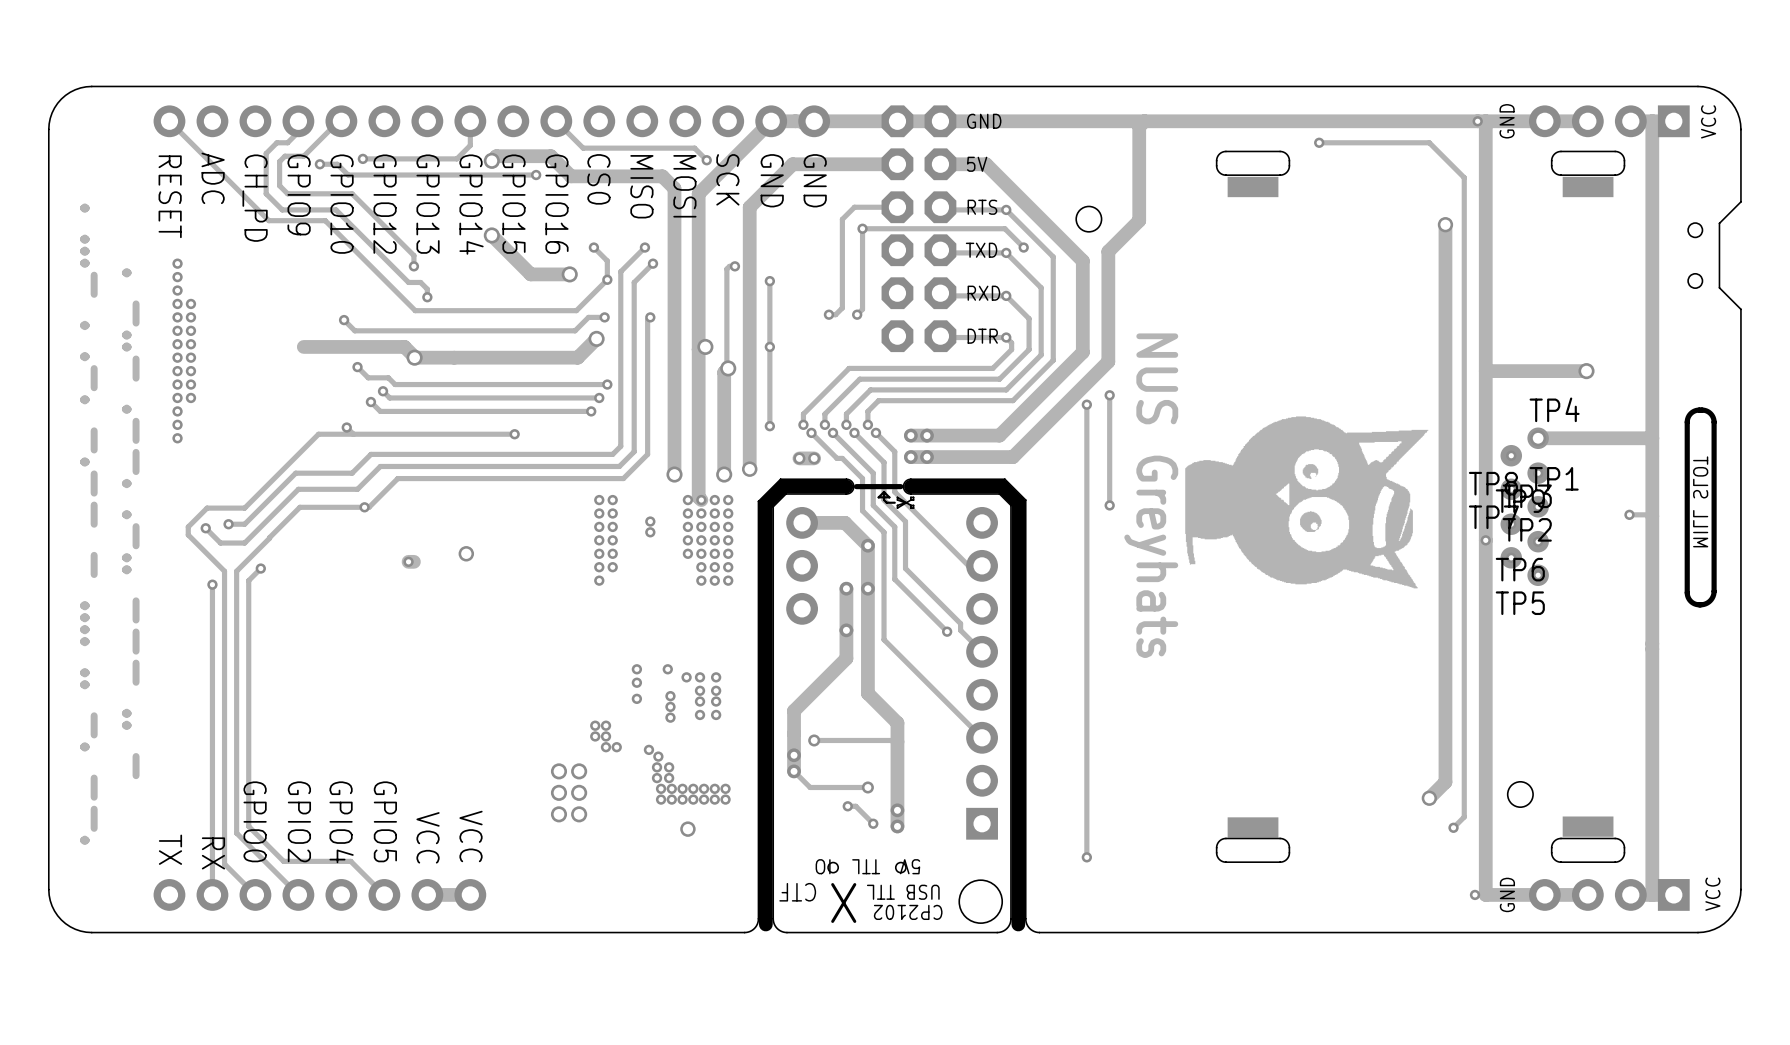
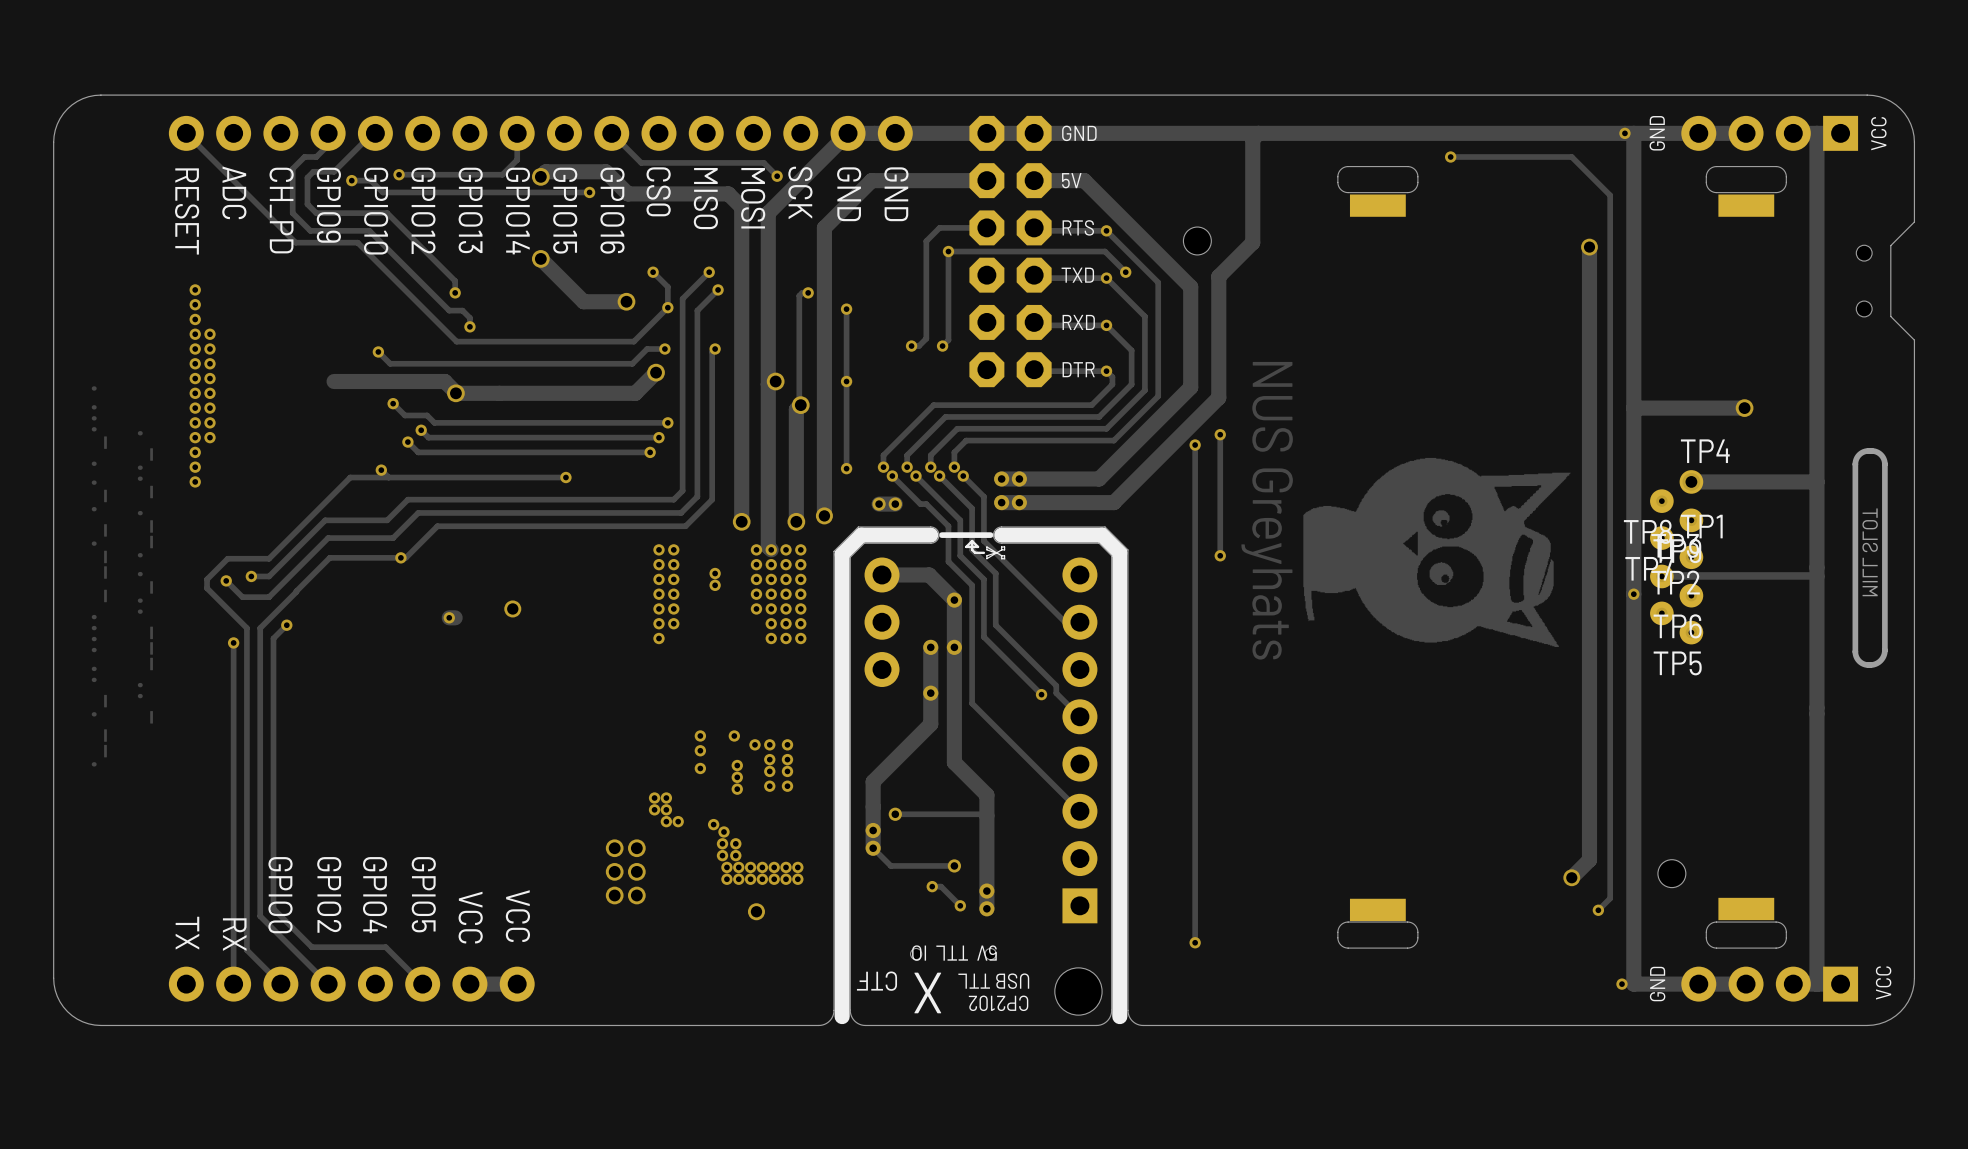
via: (1629, 514) -> none
track: (1650, 514) (1629, 514) -> none
track: none -> (1816, 576) (1661, 576)

